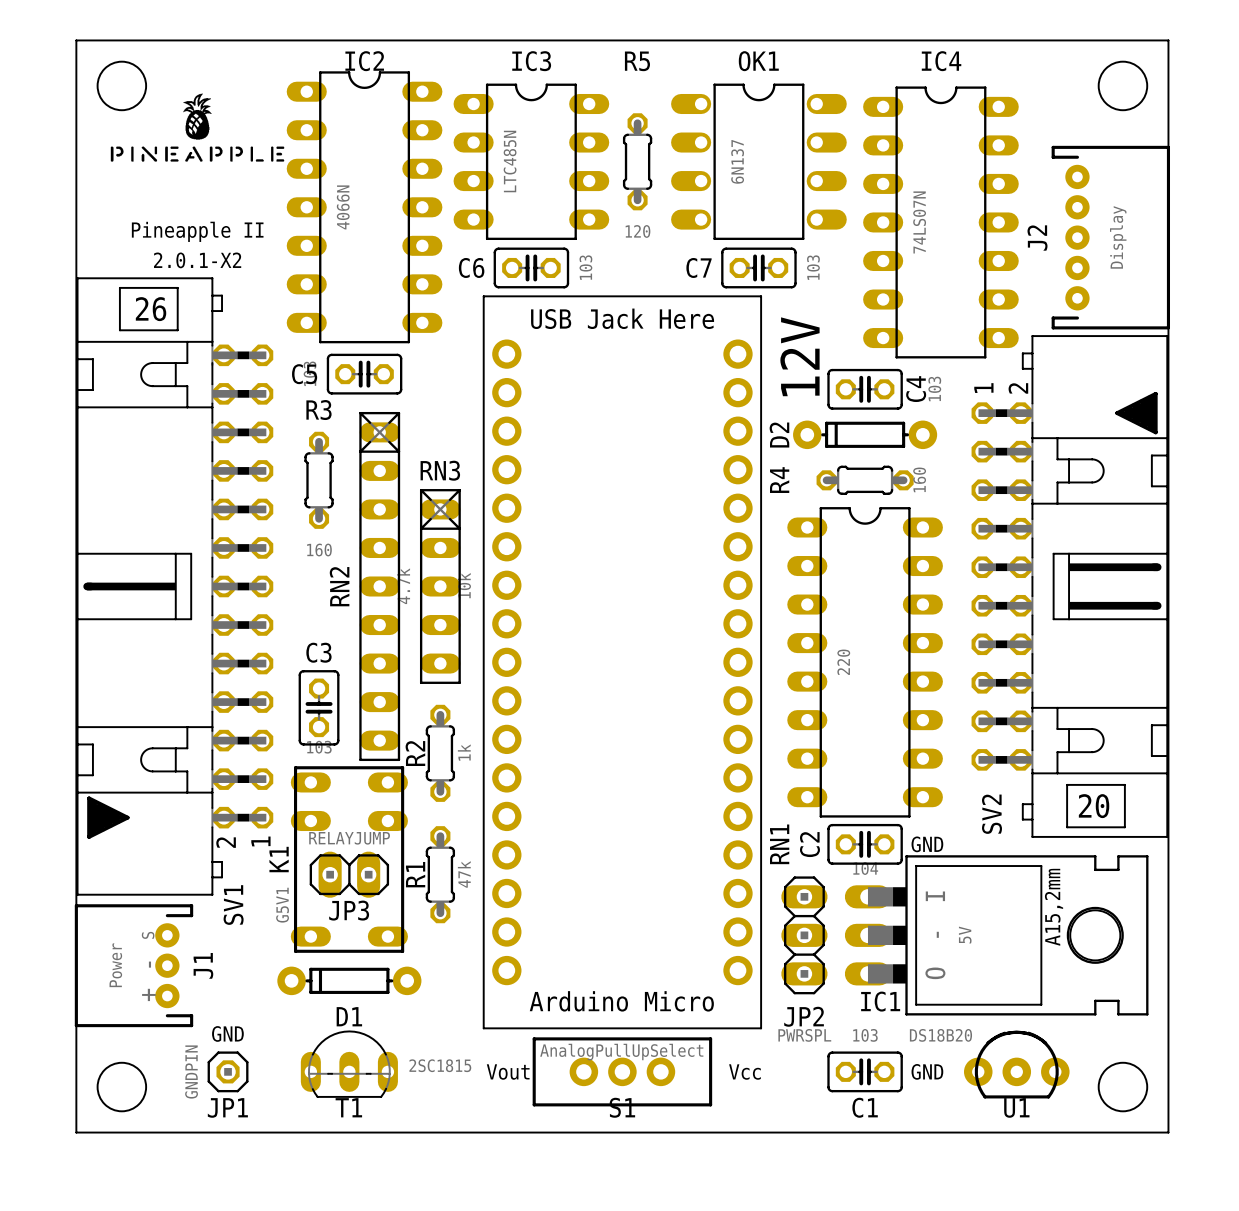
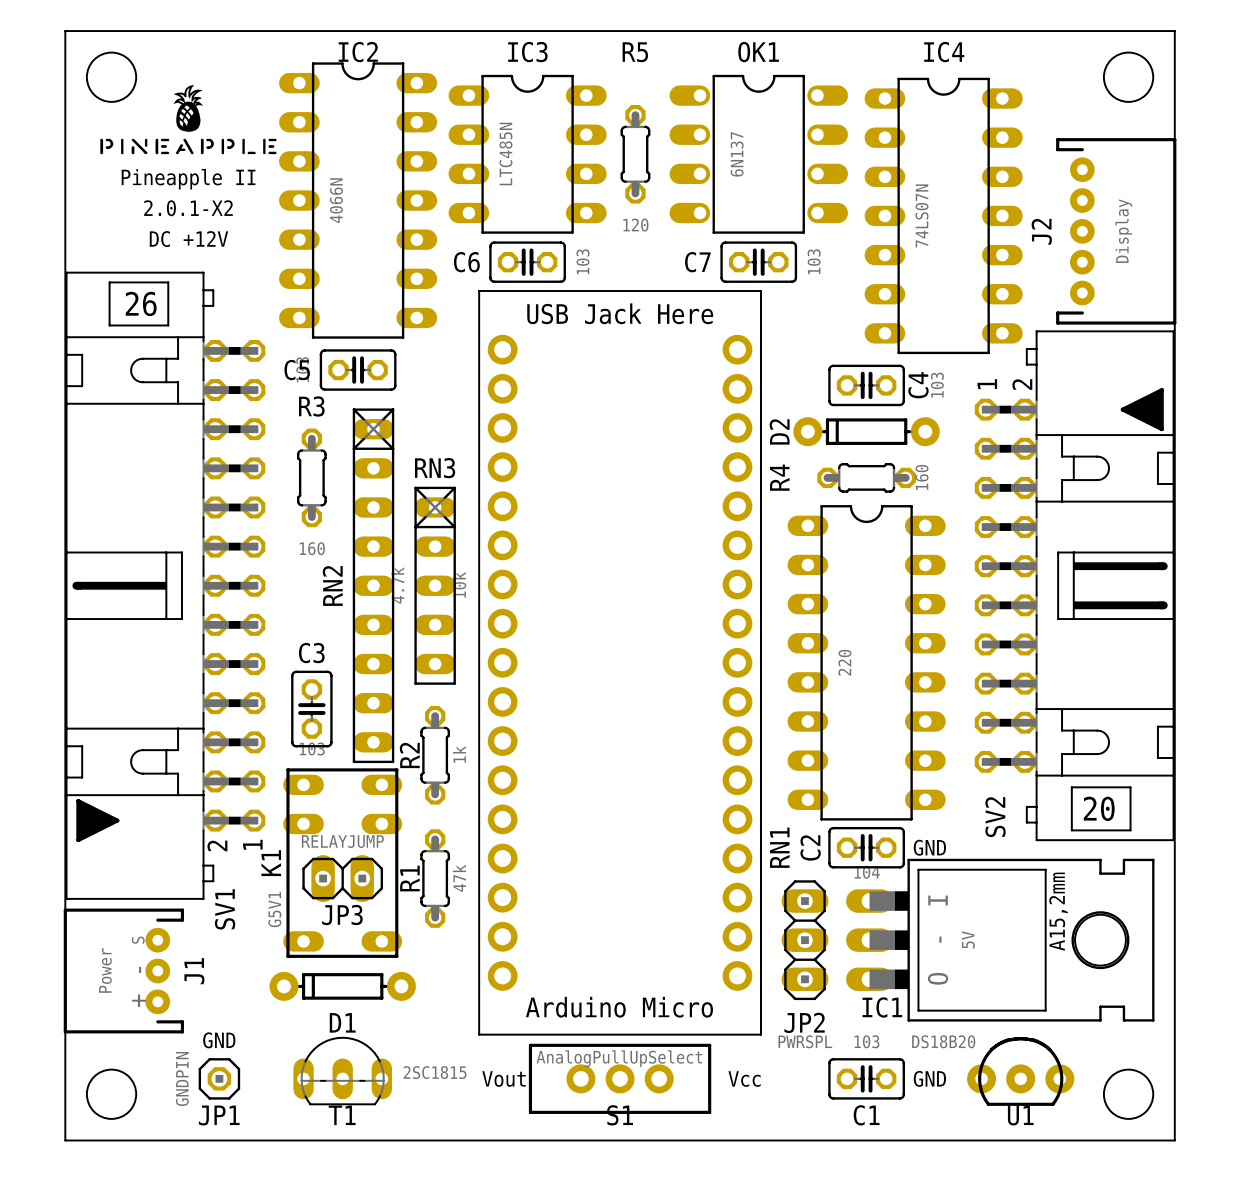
text position: Pineapple II (197, 231) -> Pineapple II (188, 179)
text: none -> DC +12V (188, 239)
text position: 2.0.1-X2 (197, 260) -> 2.0.1-X2 (188, 208)
text: 12V (799, 356) -> none

